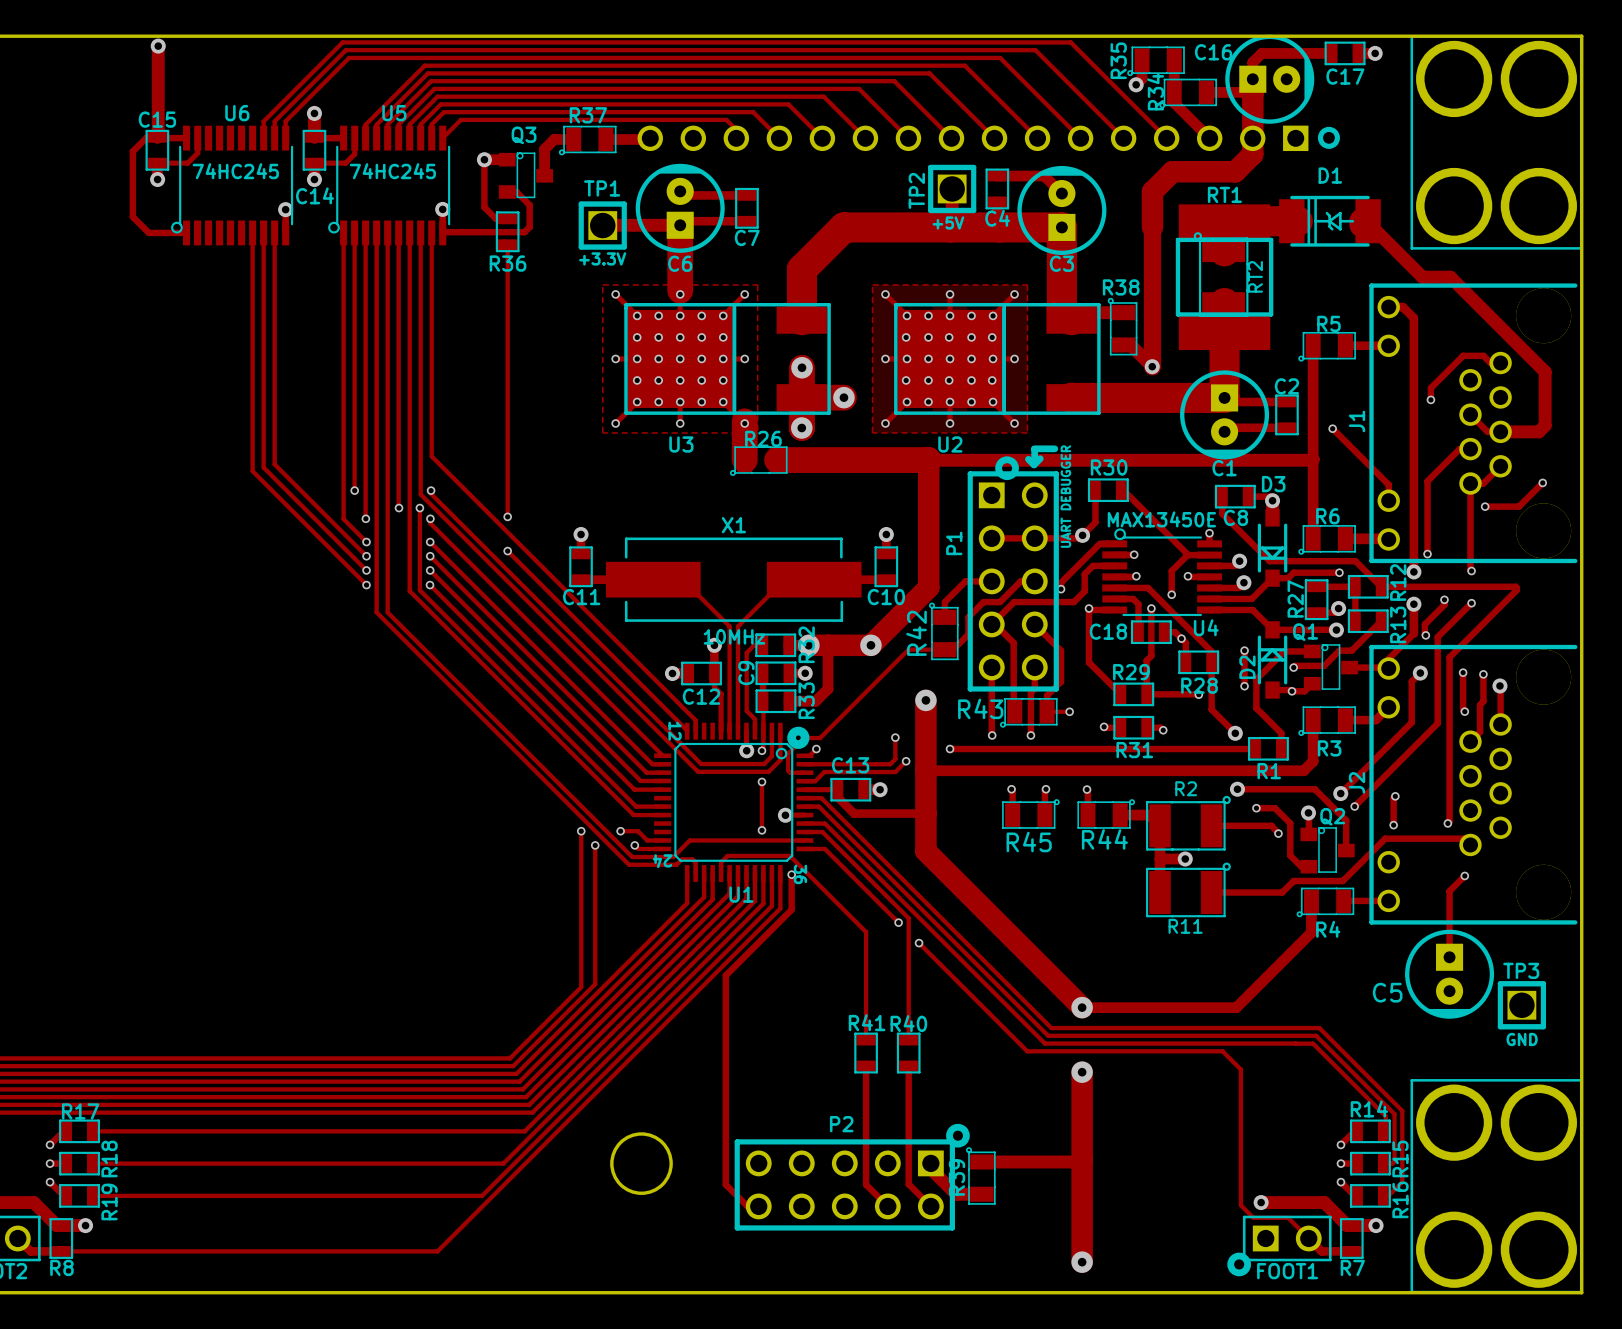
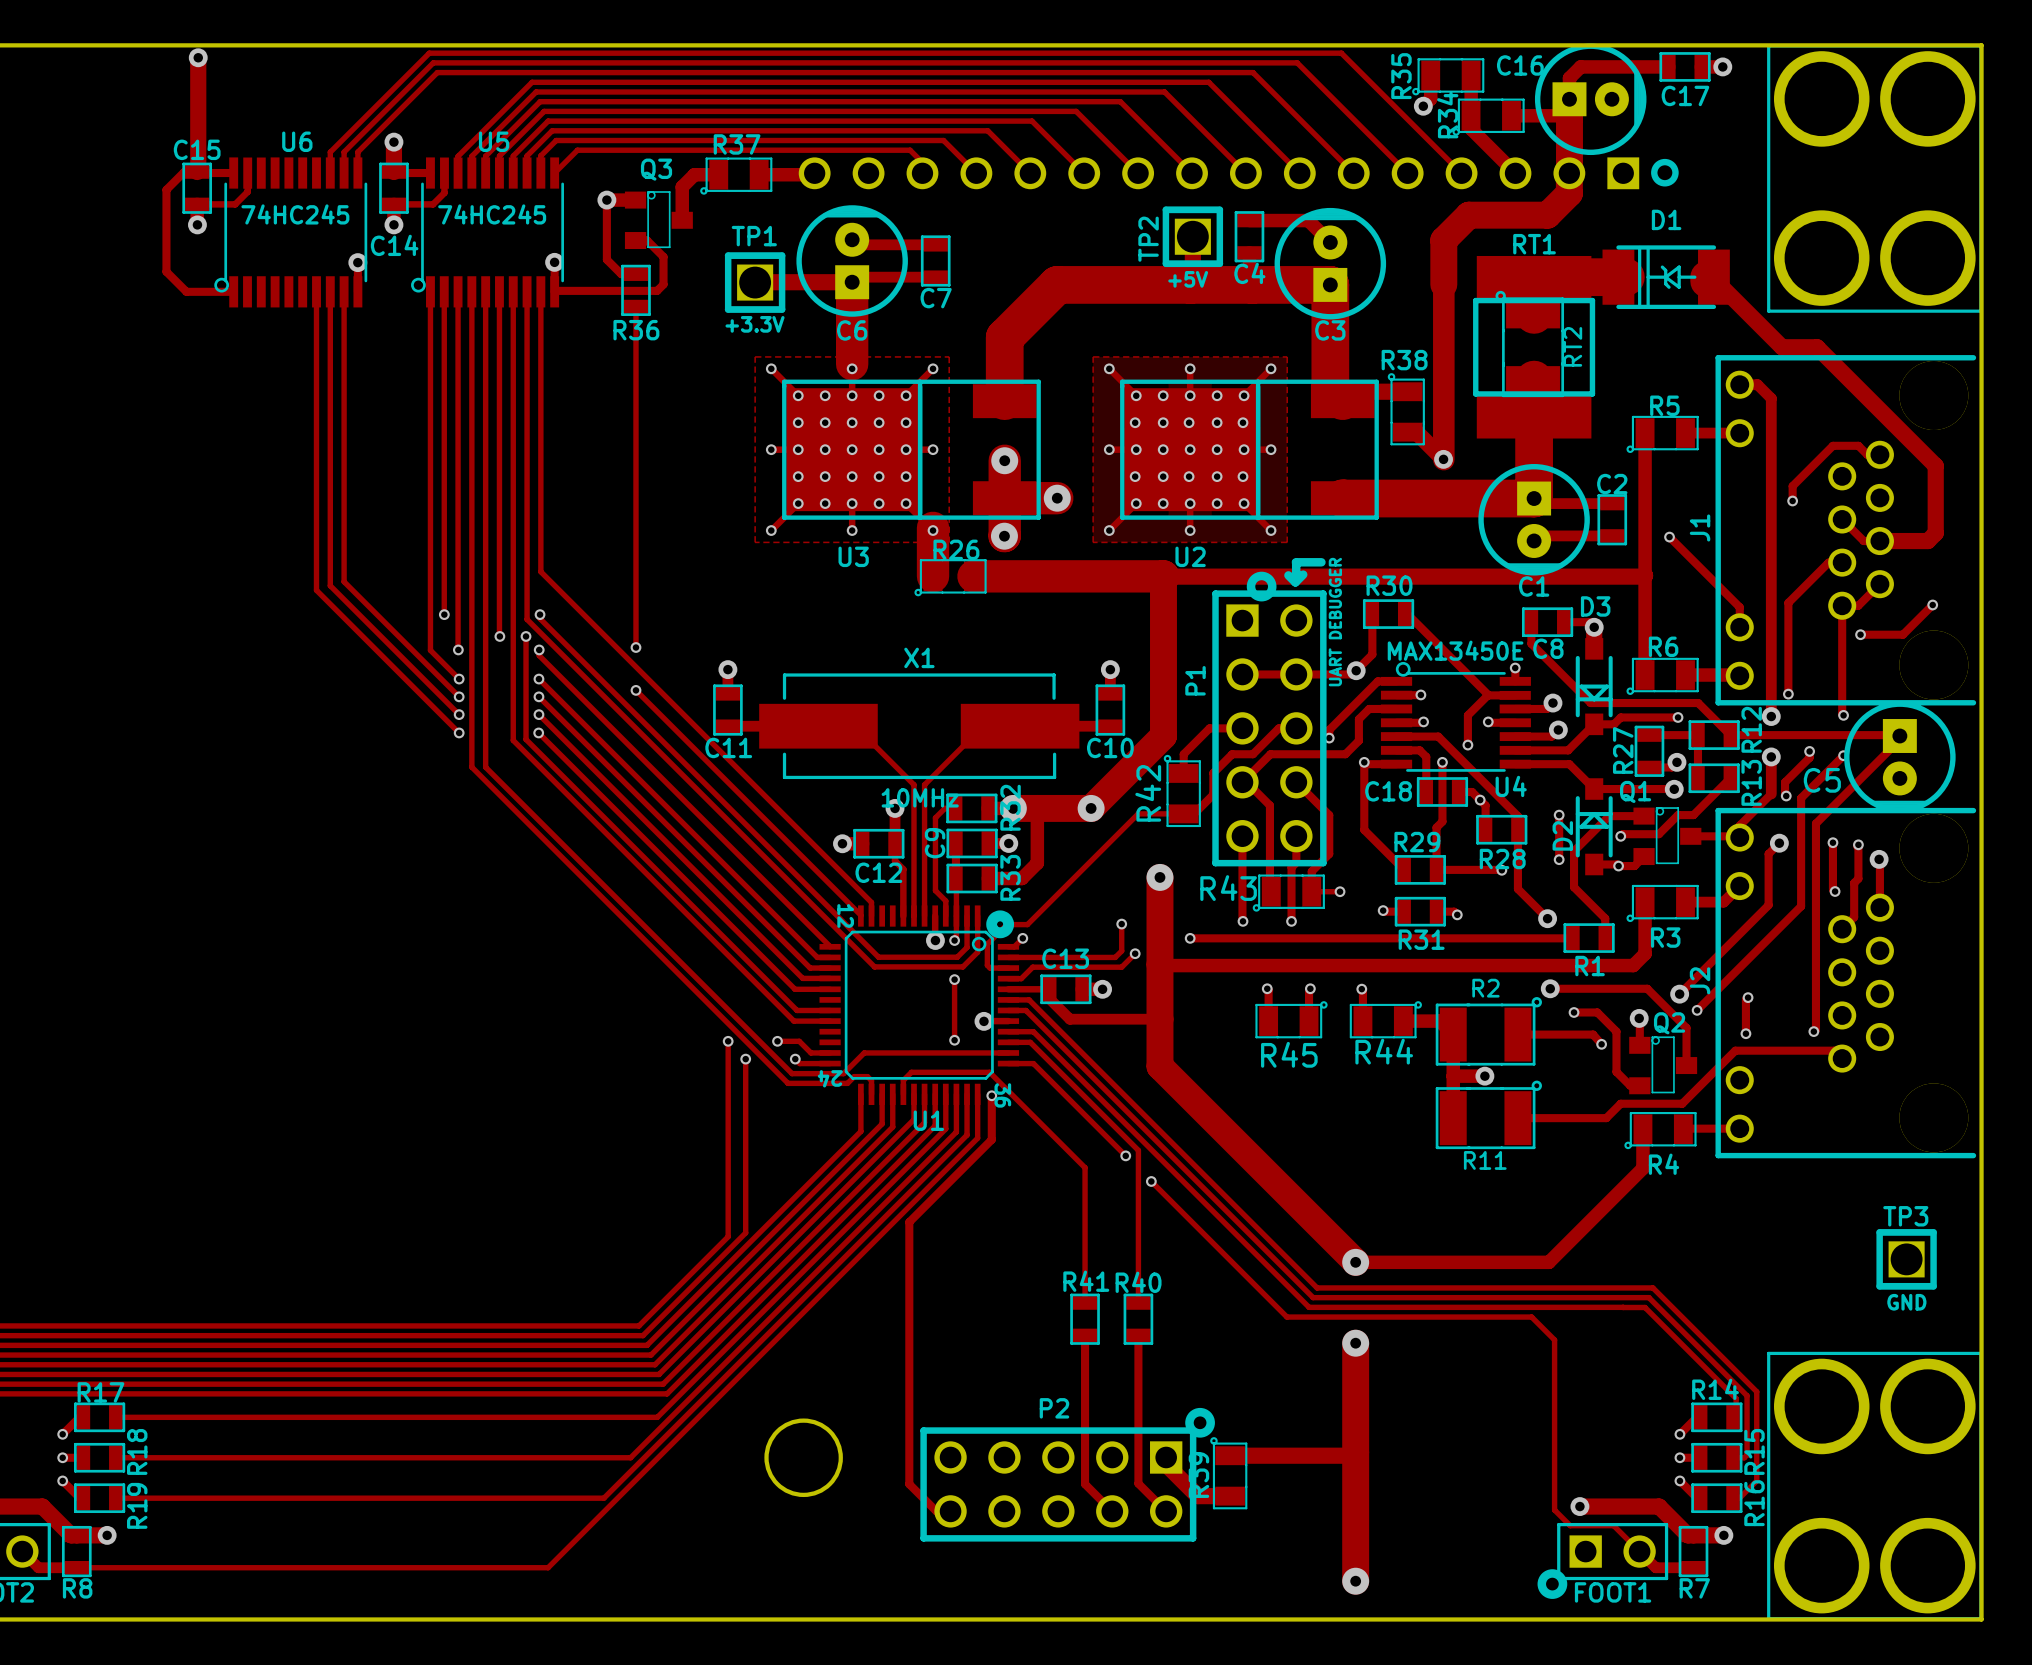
track: (1464, 875) (1449, 891) (1449, 957) -> none
via: (1464, 875) -> none
C5 position: (1449, 974) -> (1899, 757)

